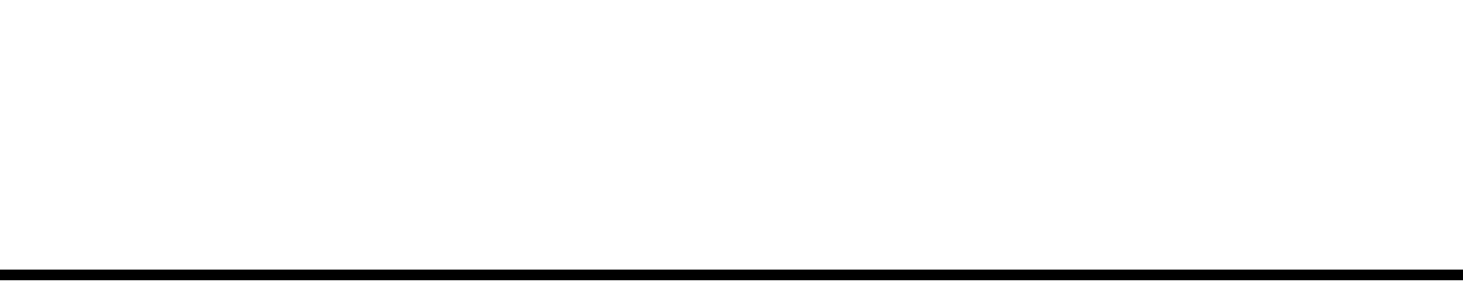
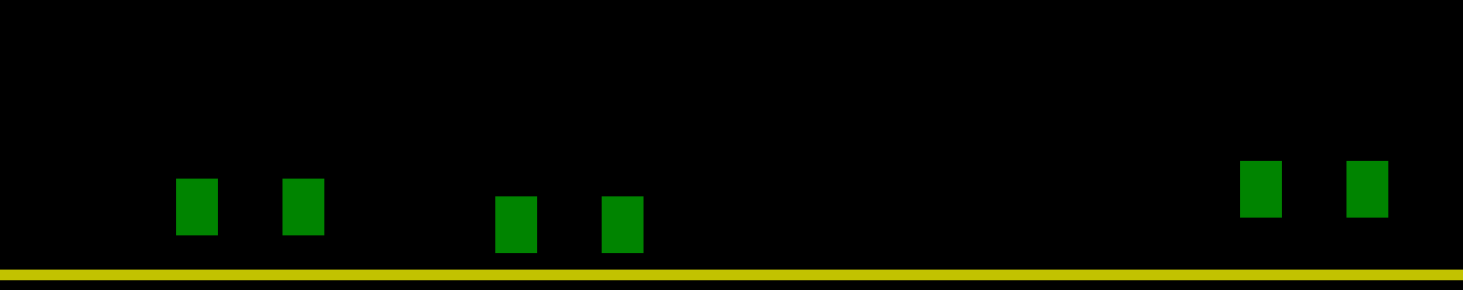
part: none -> (1314, 189)
part: none -> (250, 206)
part: none -> (569, 224)

